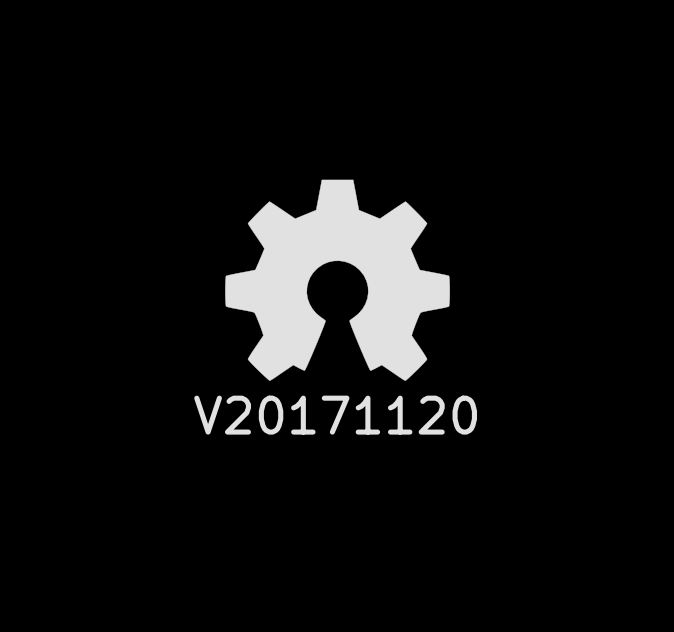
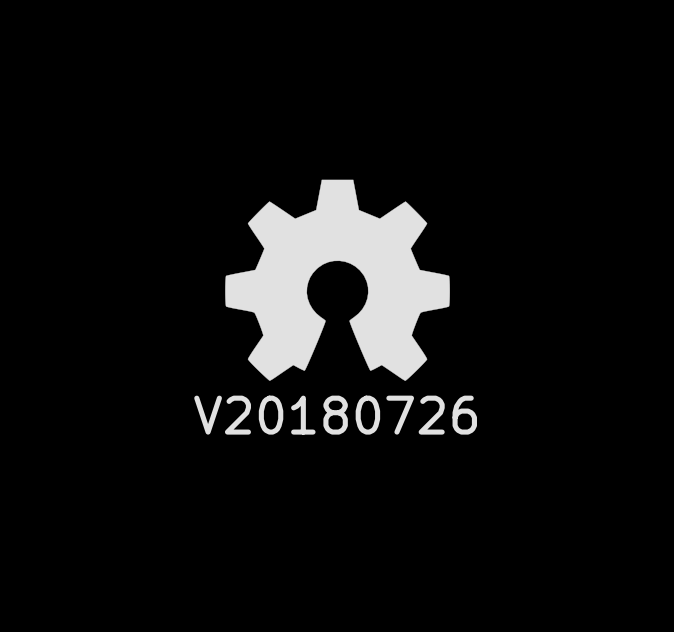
drawing shape: [194, 395, 477, 435] -> [194, 395, 477, 435]

